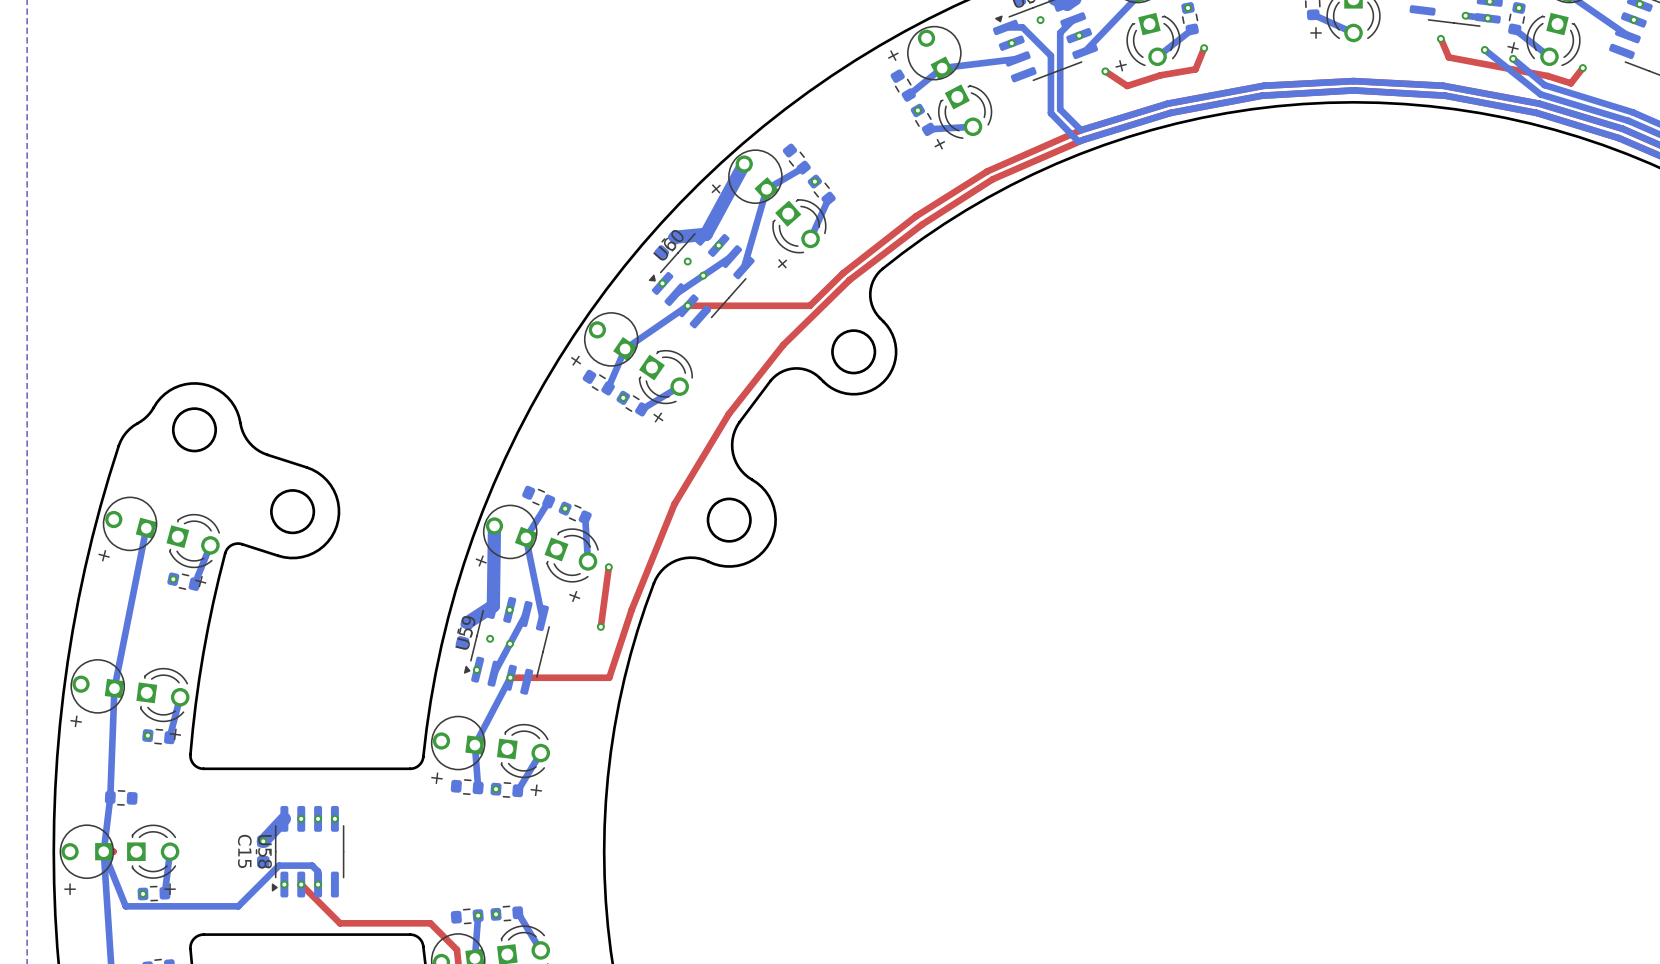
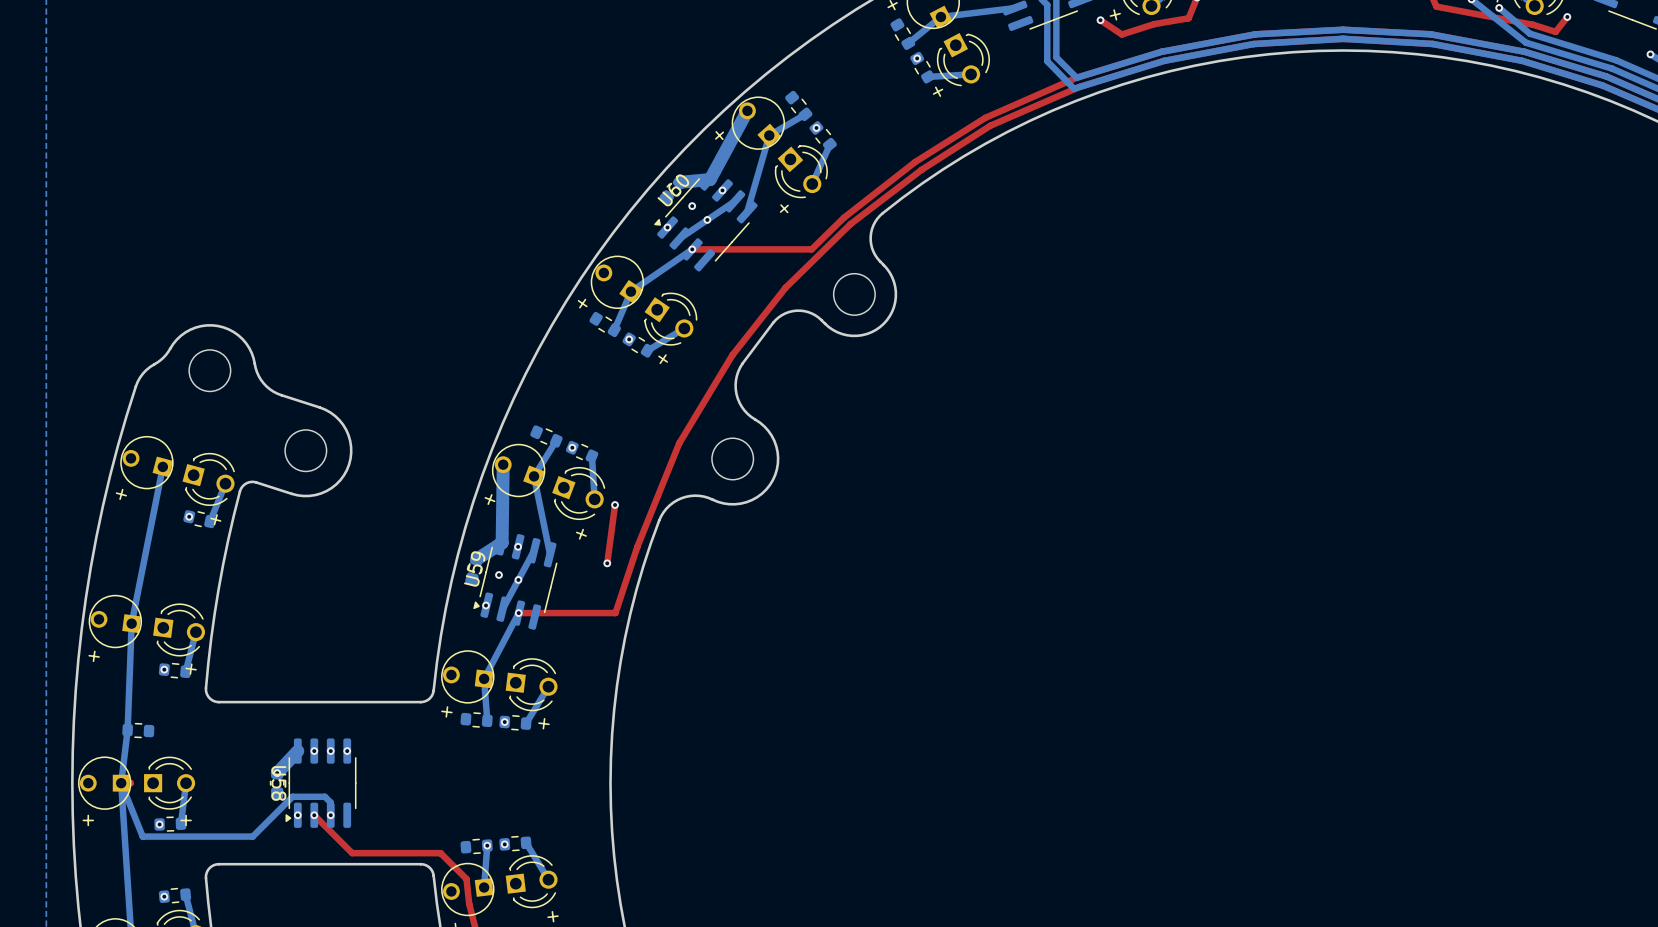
round board edge: [831, 329, 877, 375] -> none
round board edge: [171, 407, 218, 453] -> none
round board edge: [270, 489, 316, 535] -> none
round board edge: [706, 497, 752, 543] -> none
C15 name: C15 (244, 851) -> none

